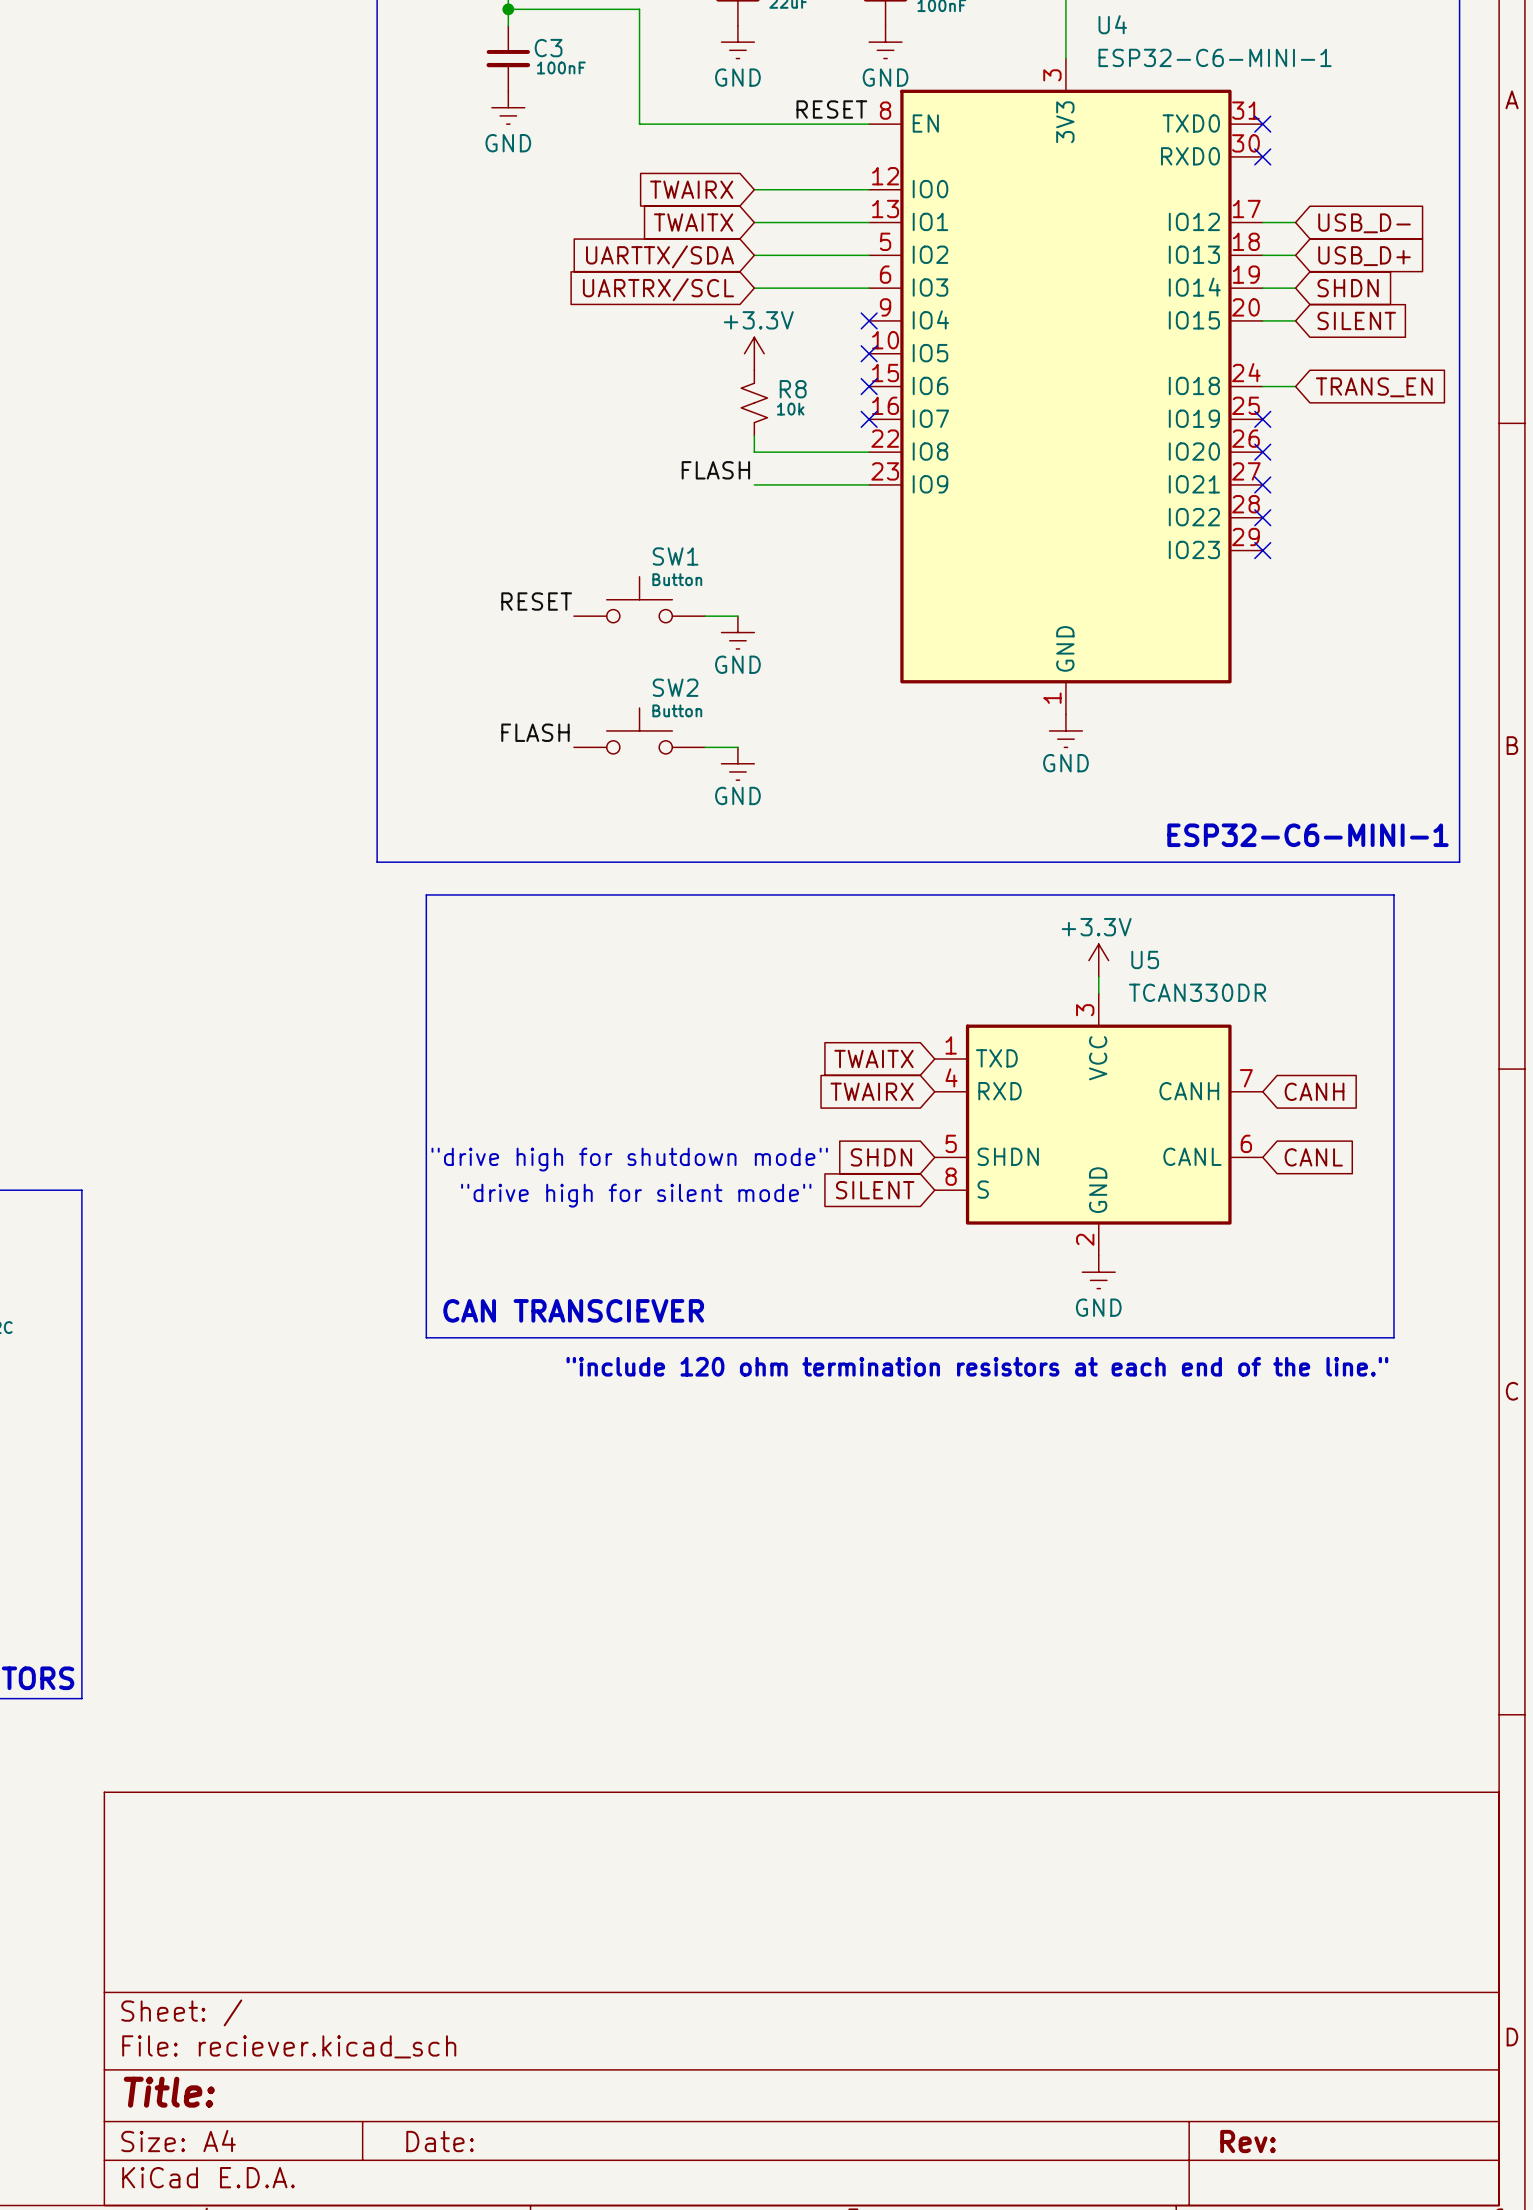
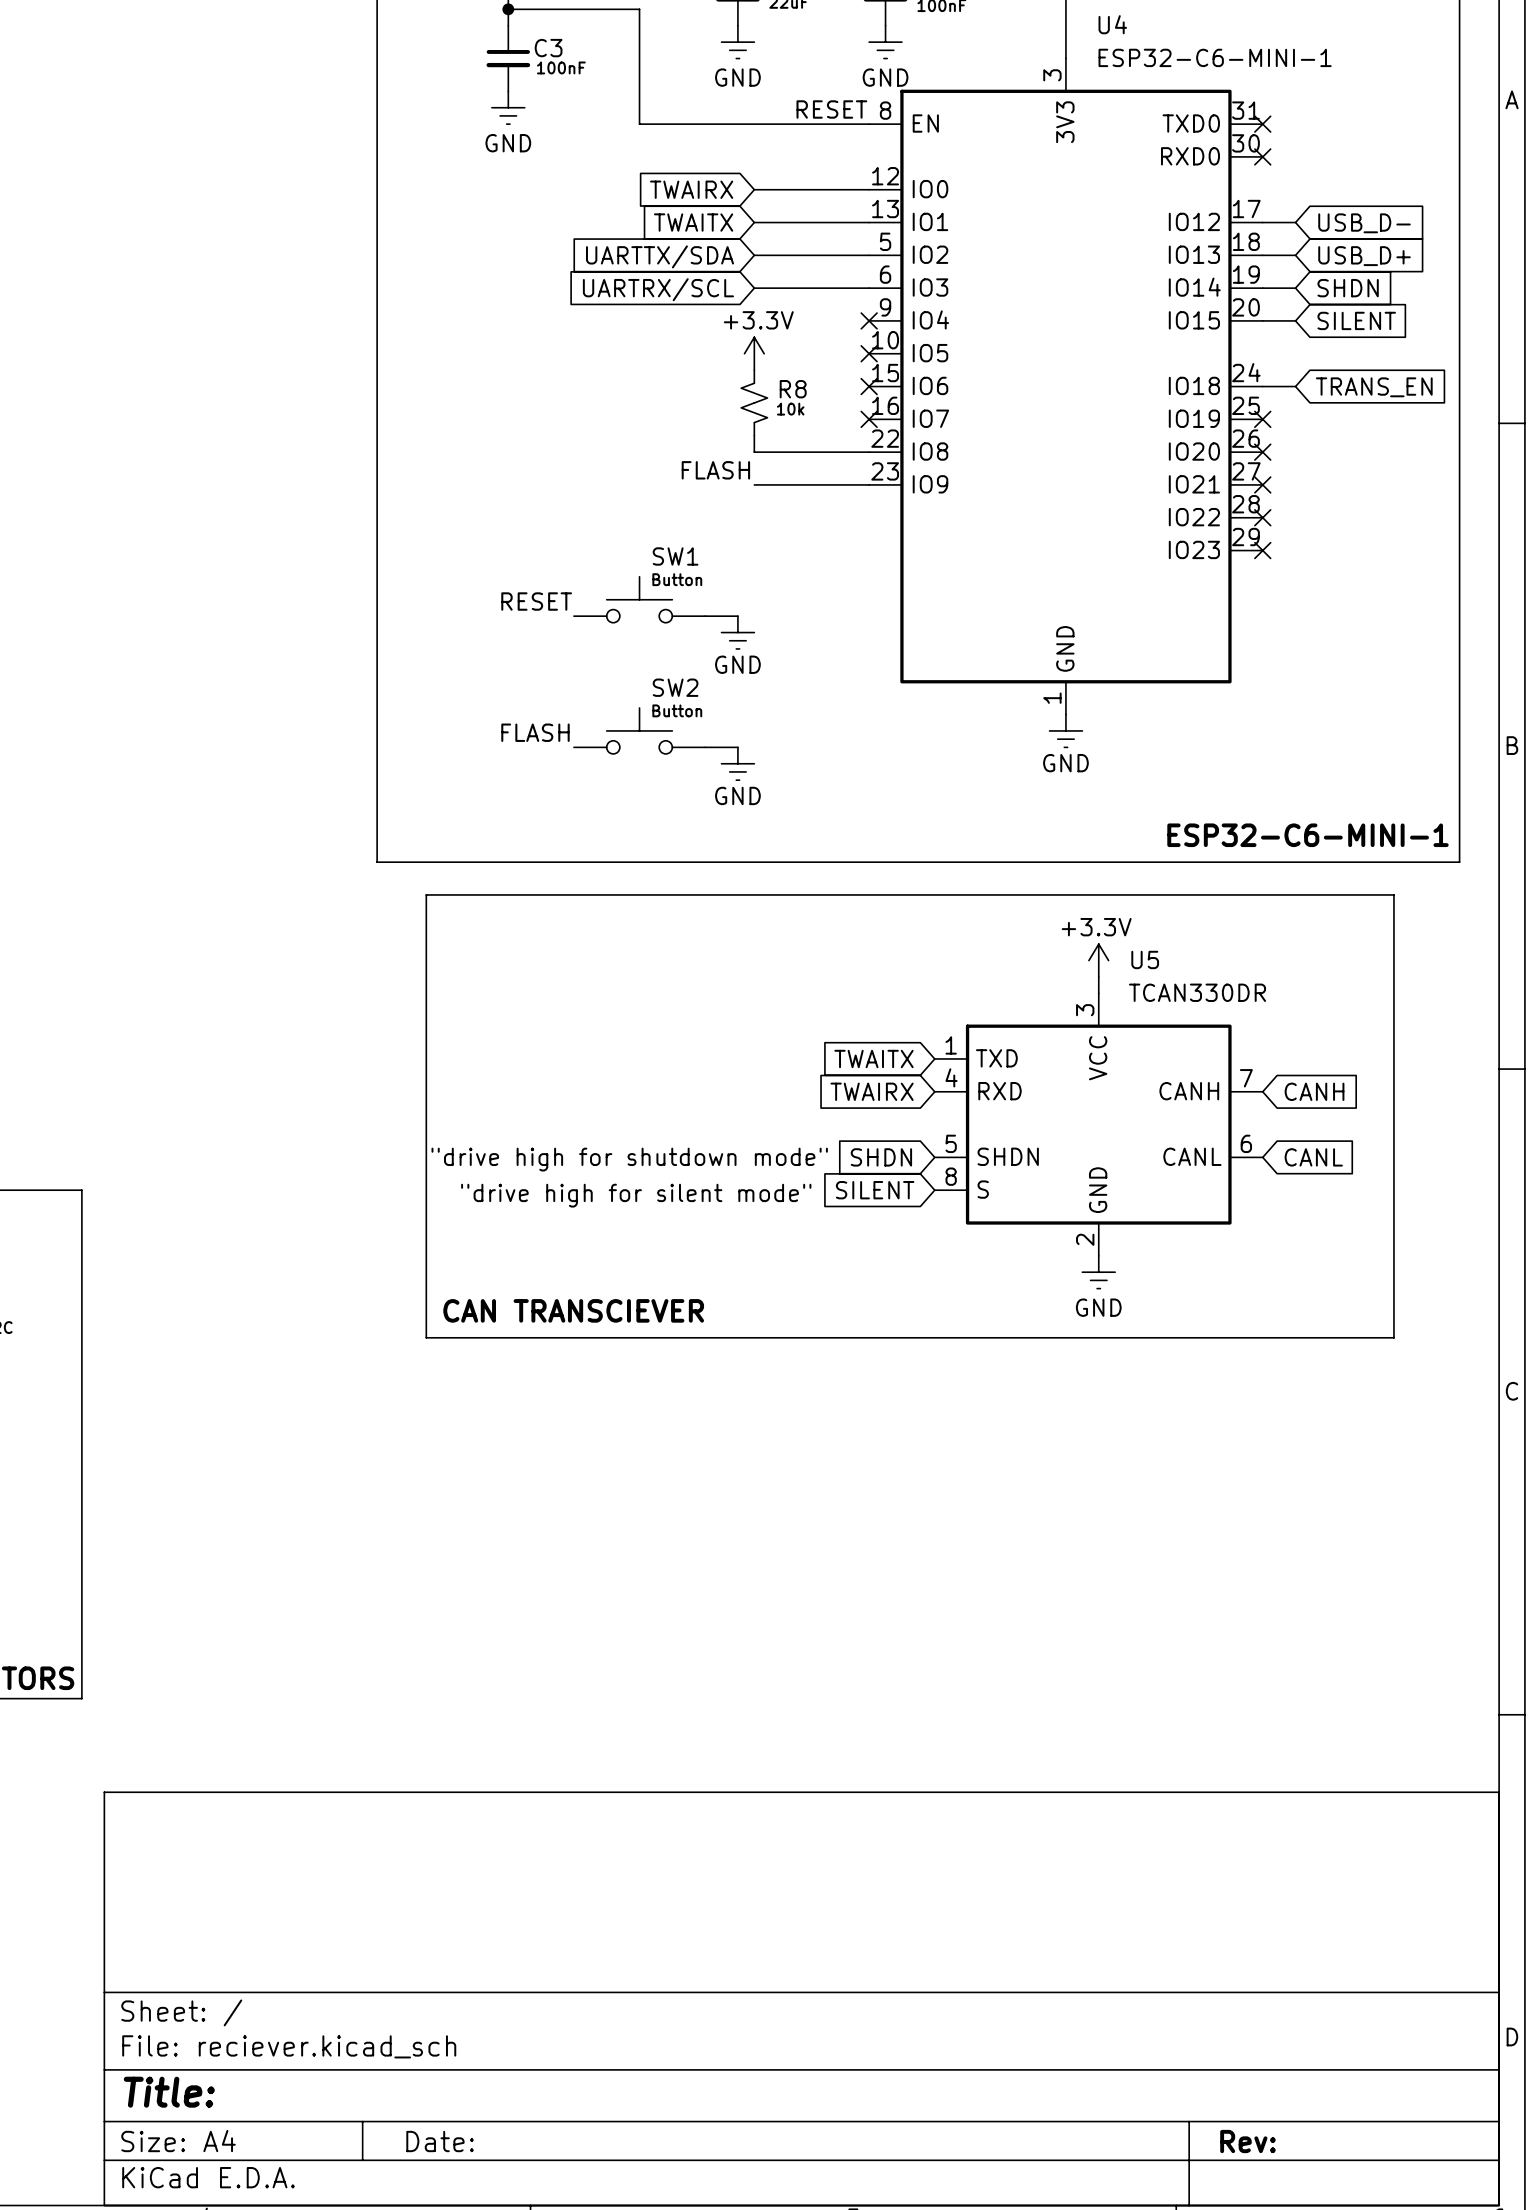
text: "include 120 ohm termination resistors at each end of the line." (977, 1366) -> none

